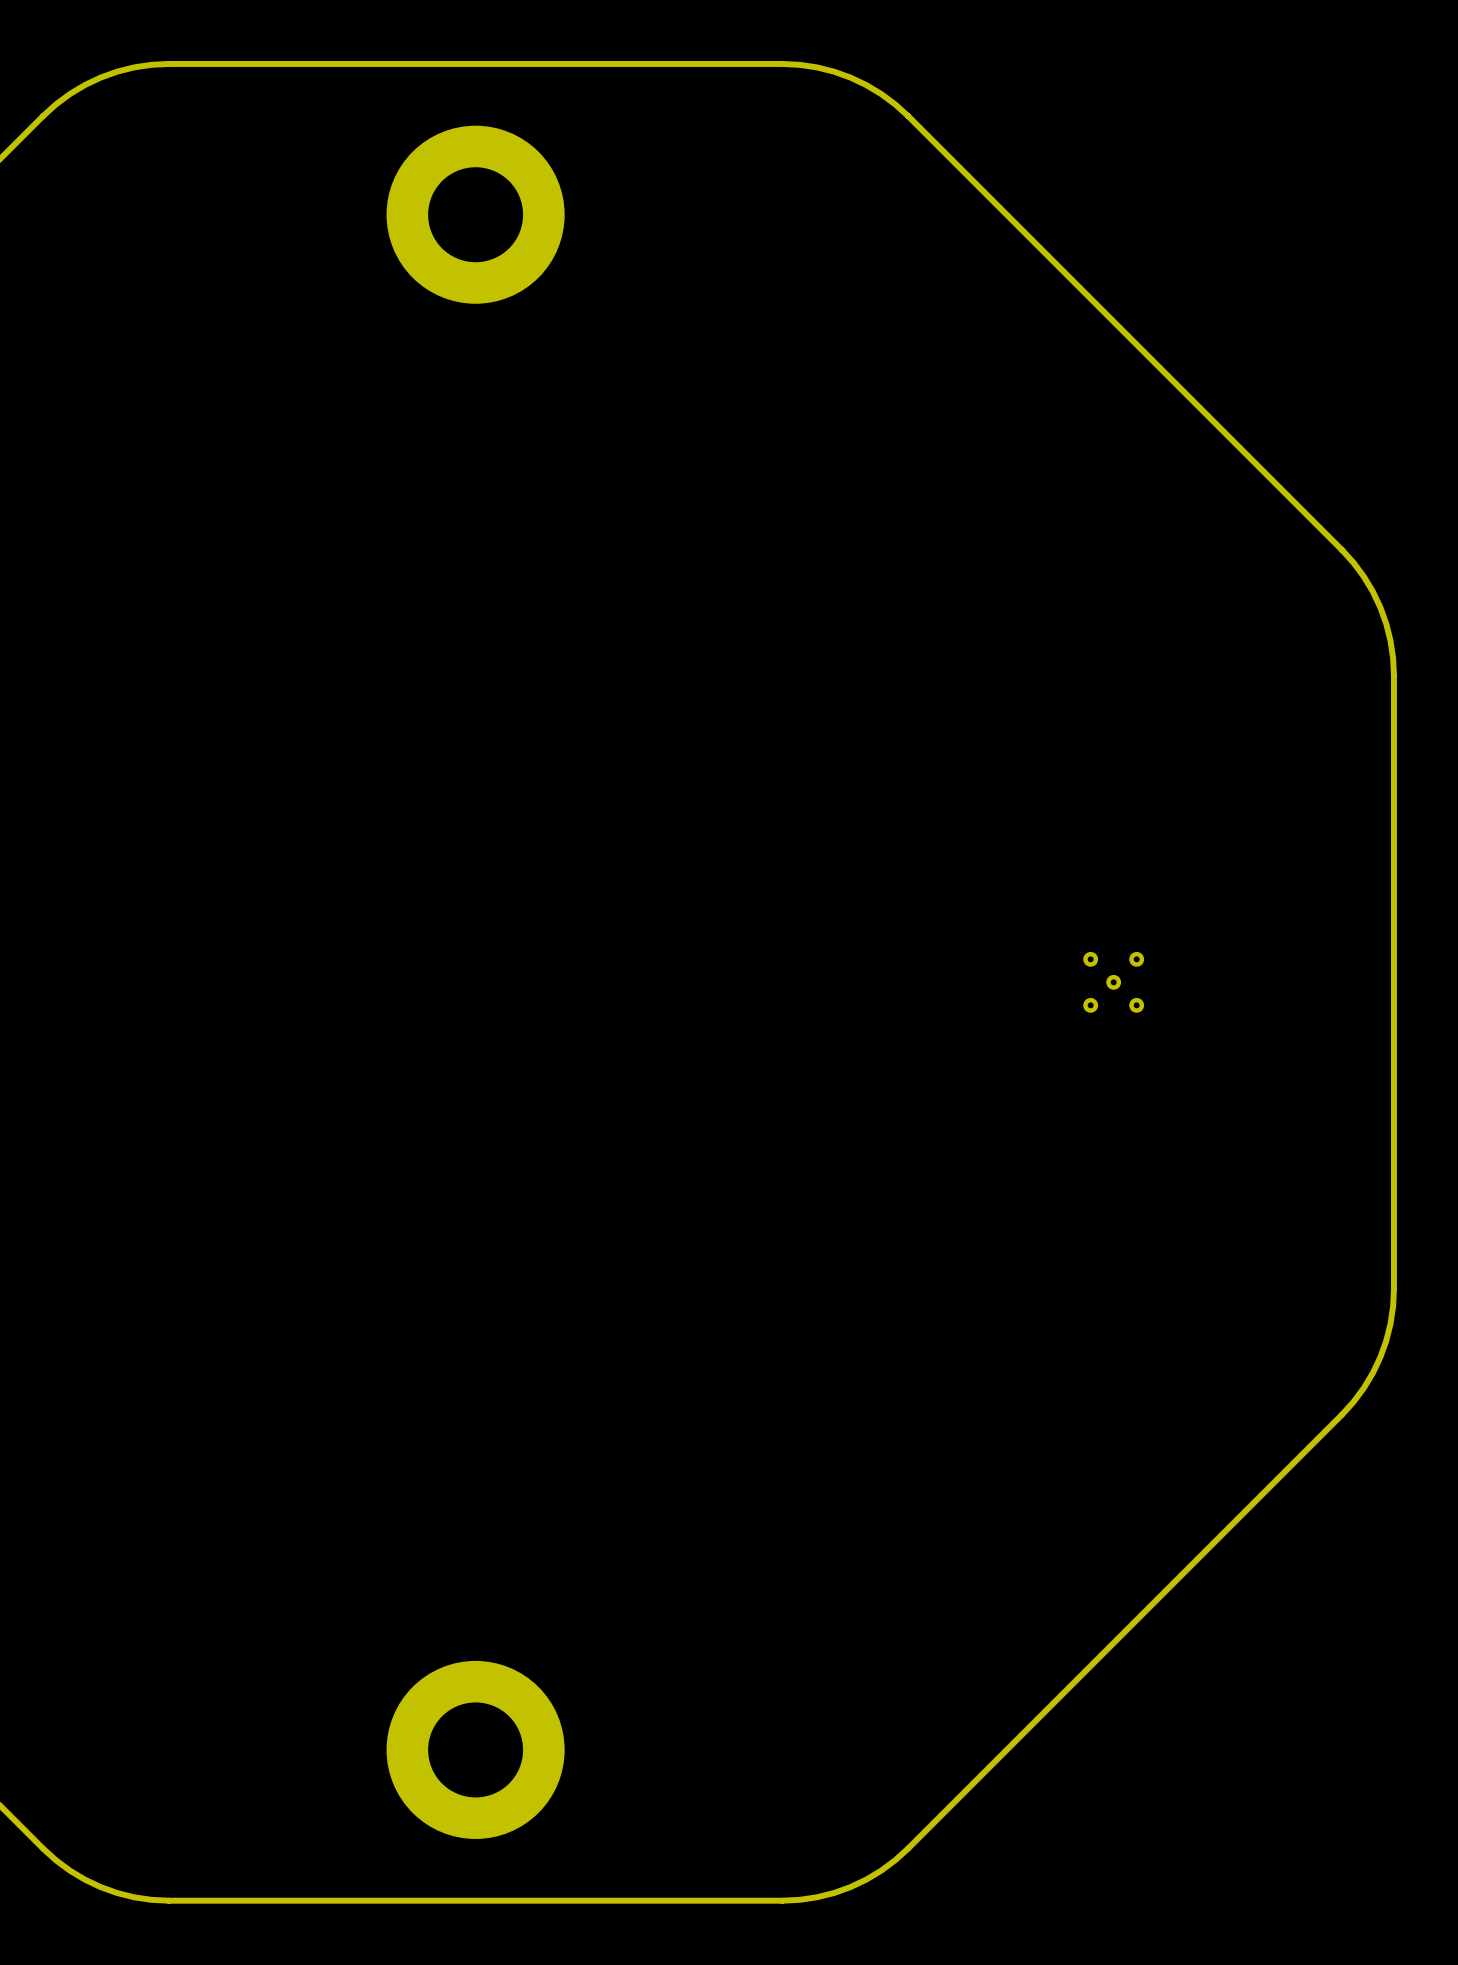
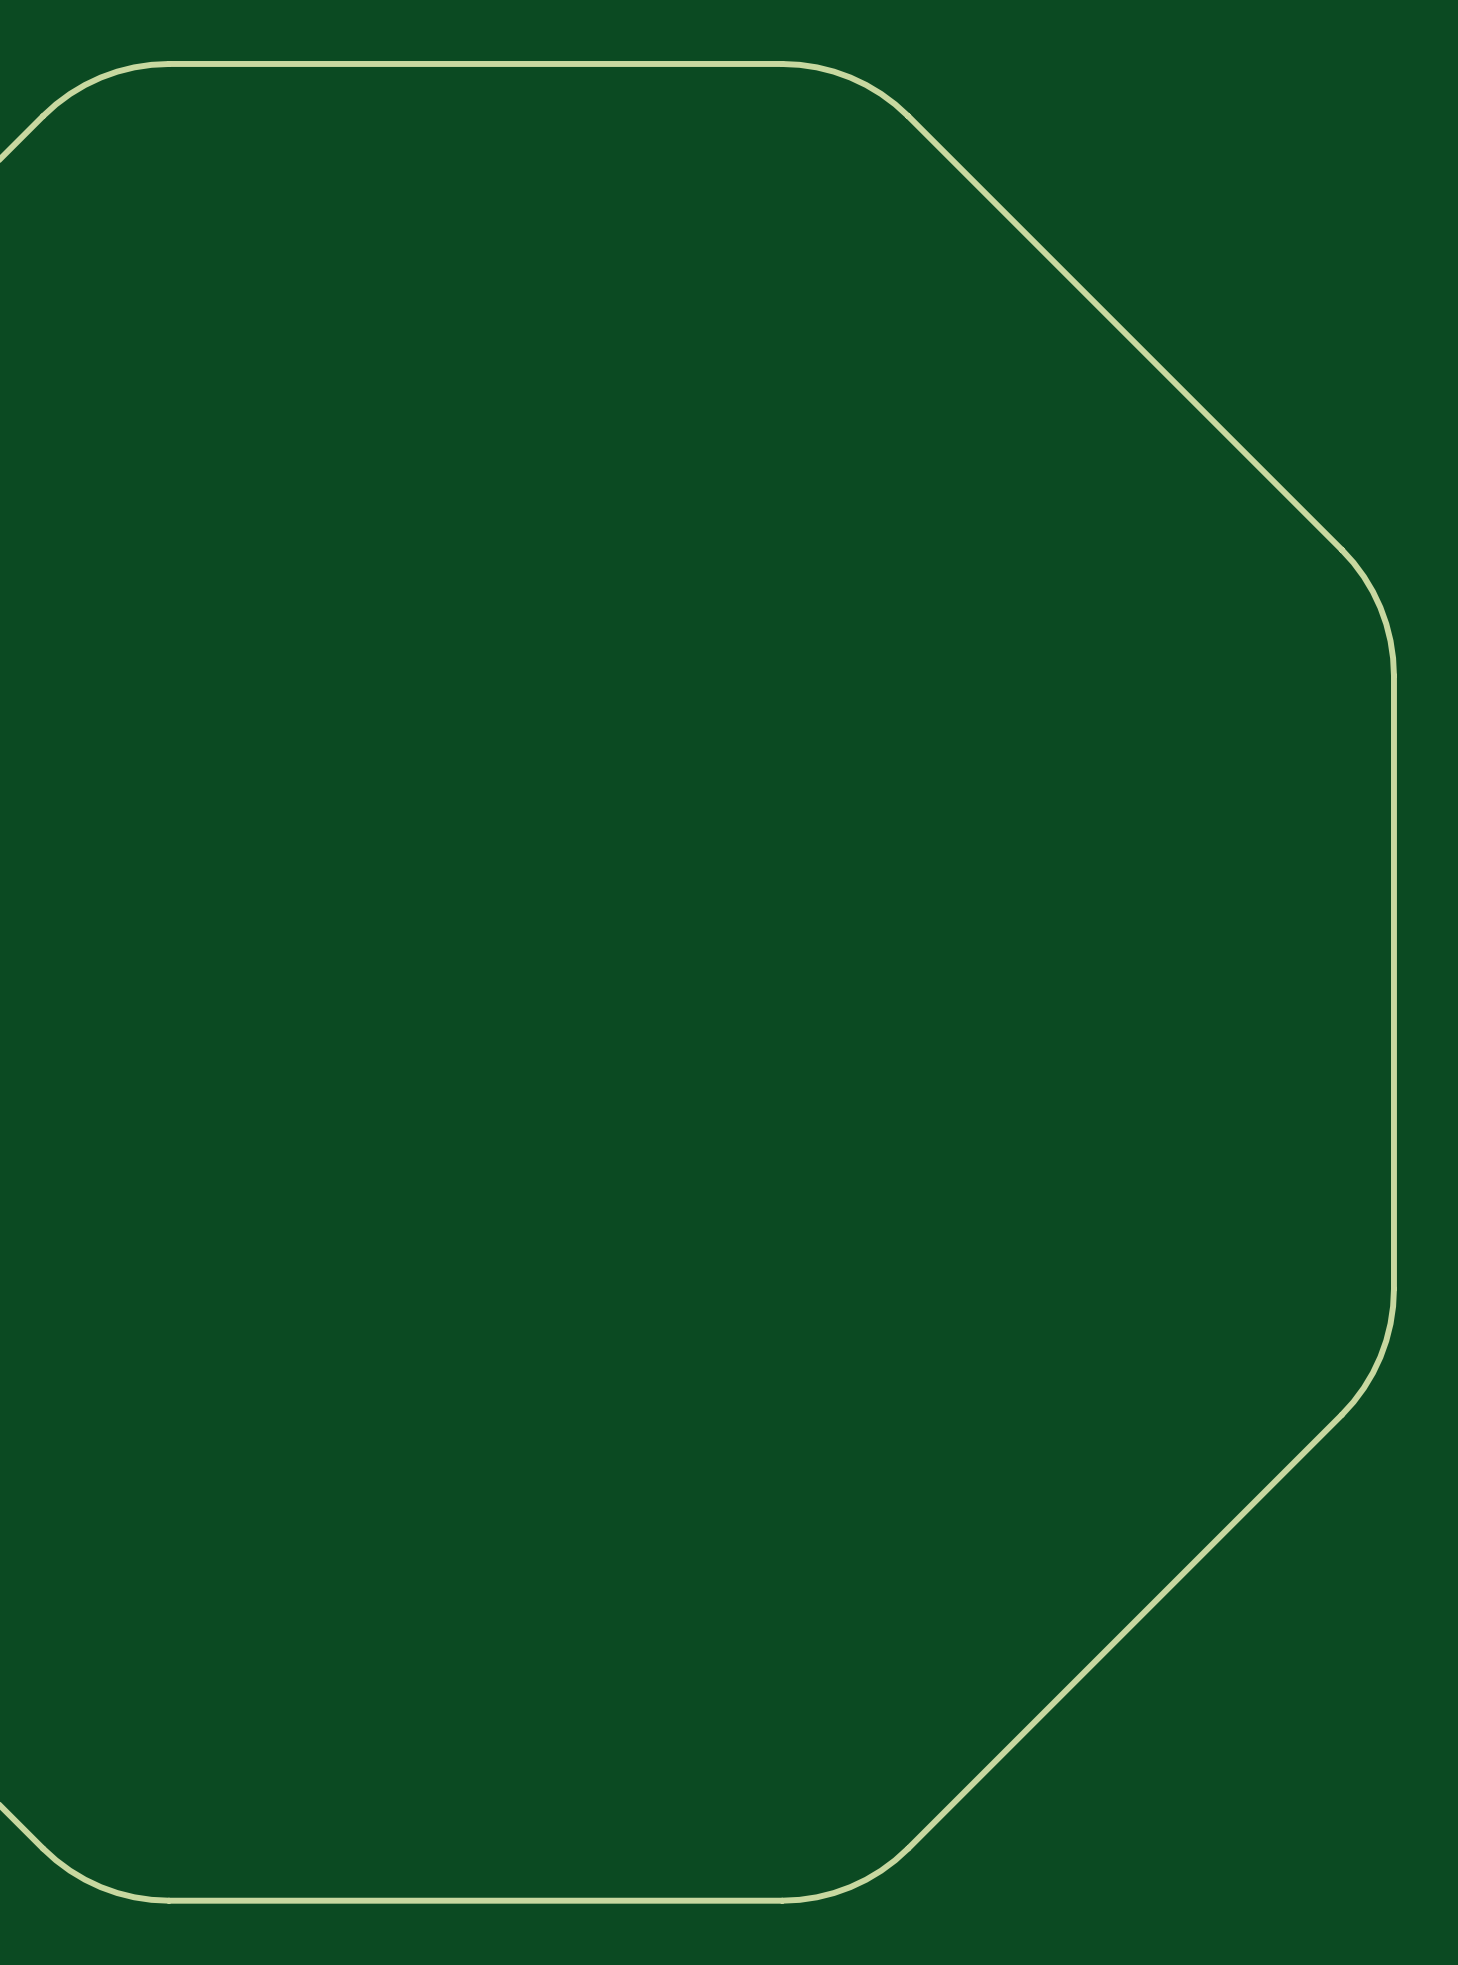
part: (475, 214) -> none
part: (1113, 982) -> none
part: (475, 1749) -> none

